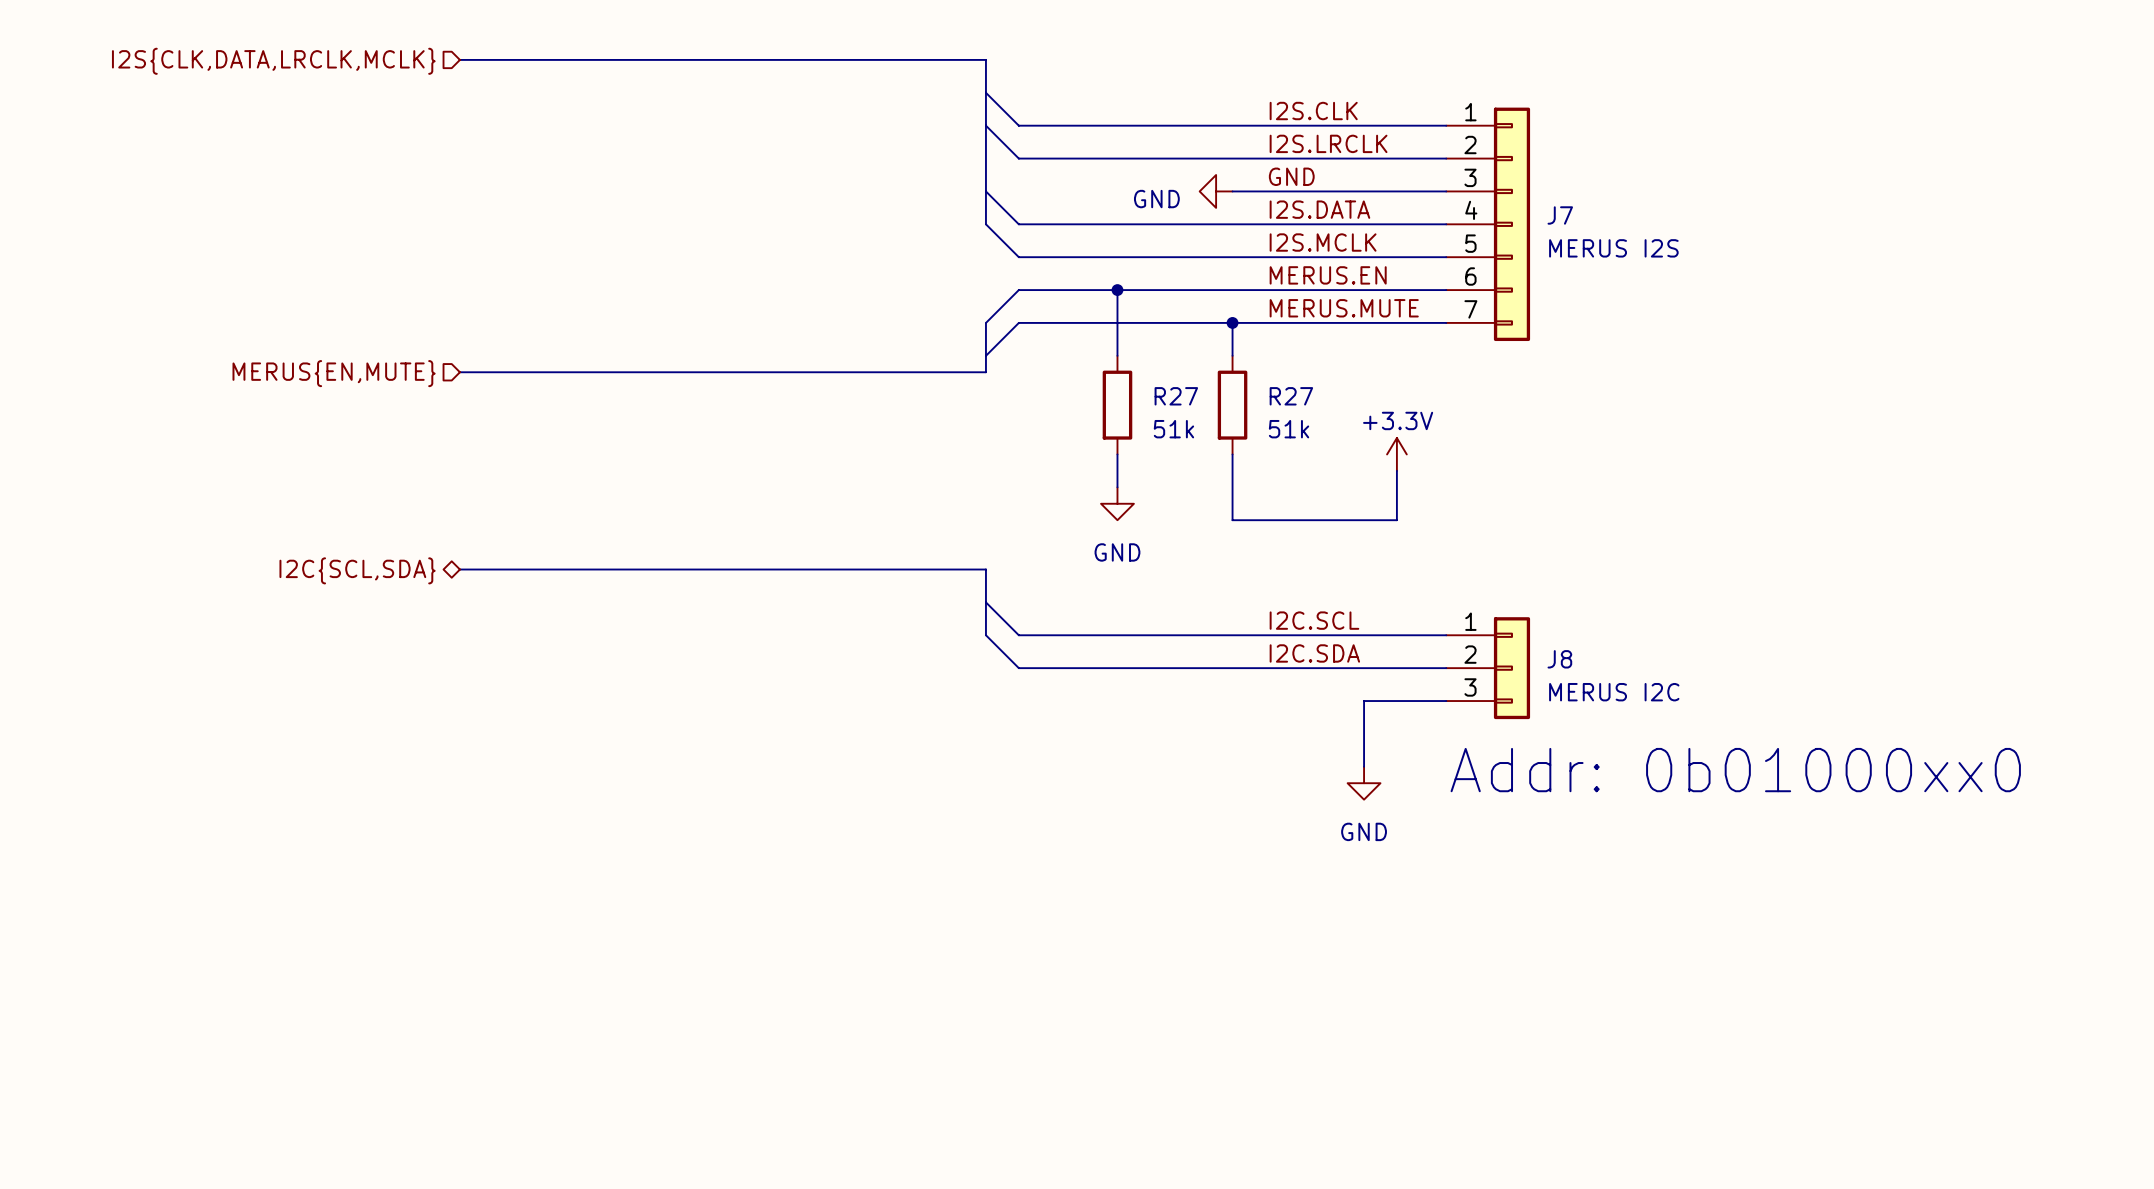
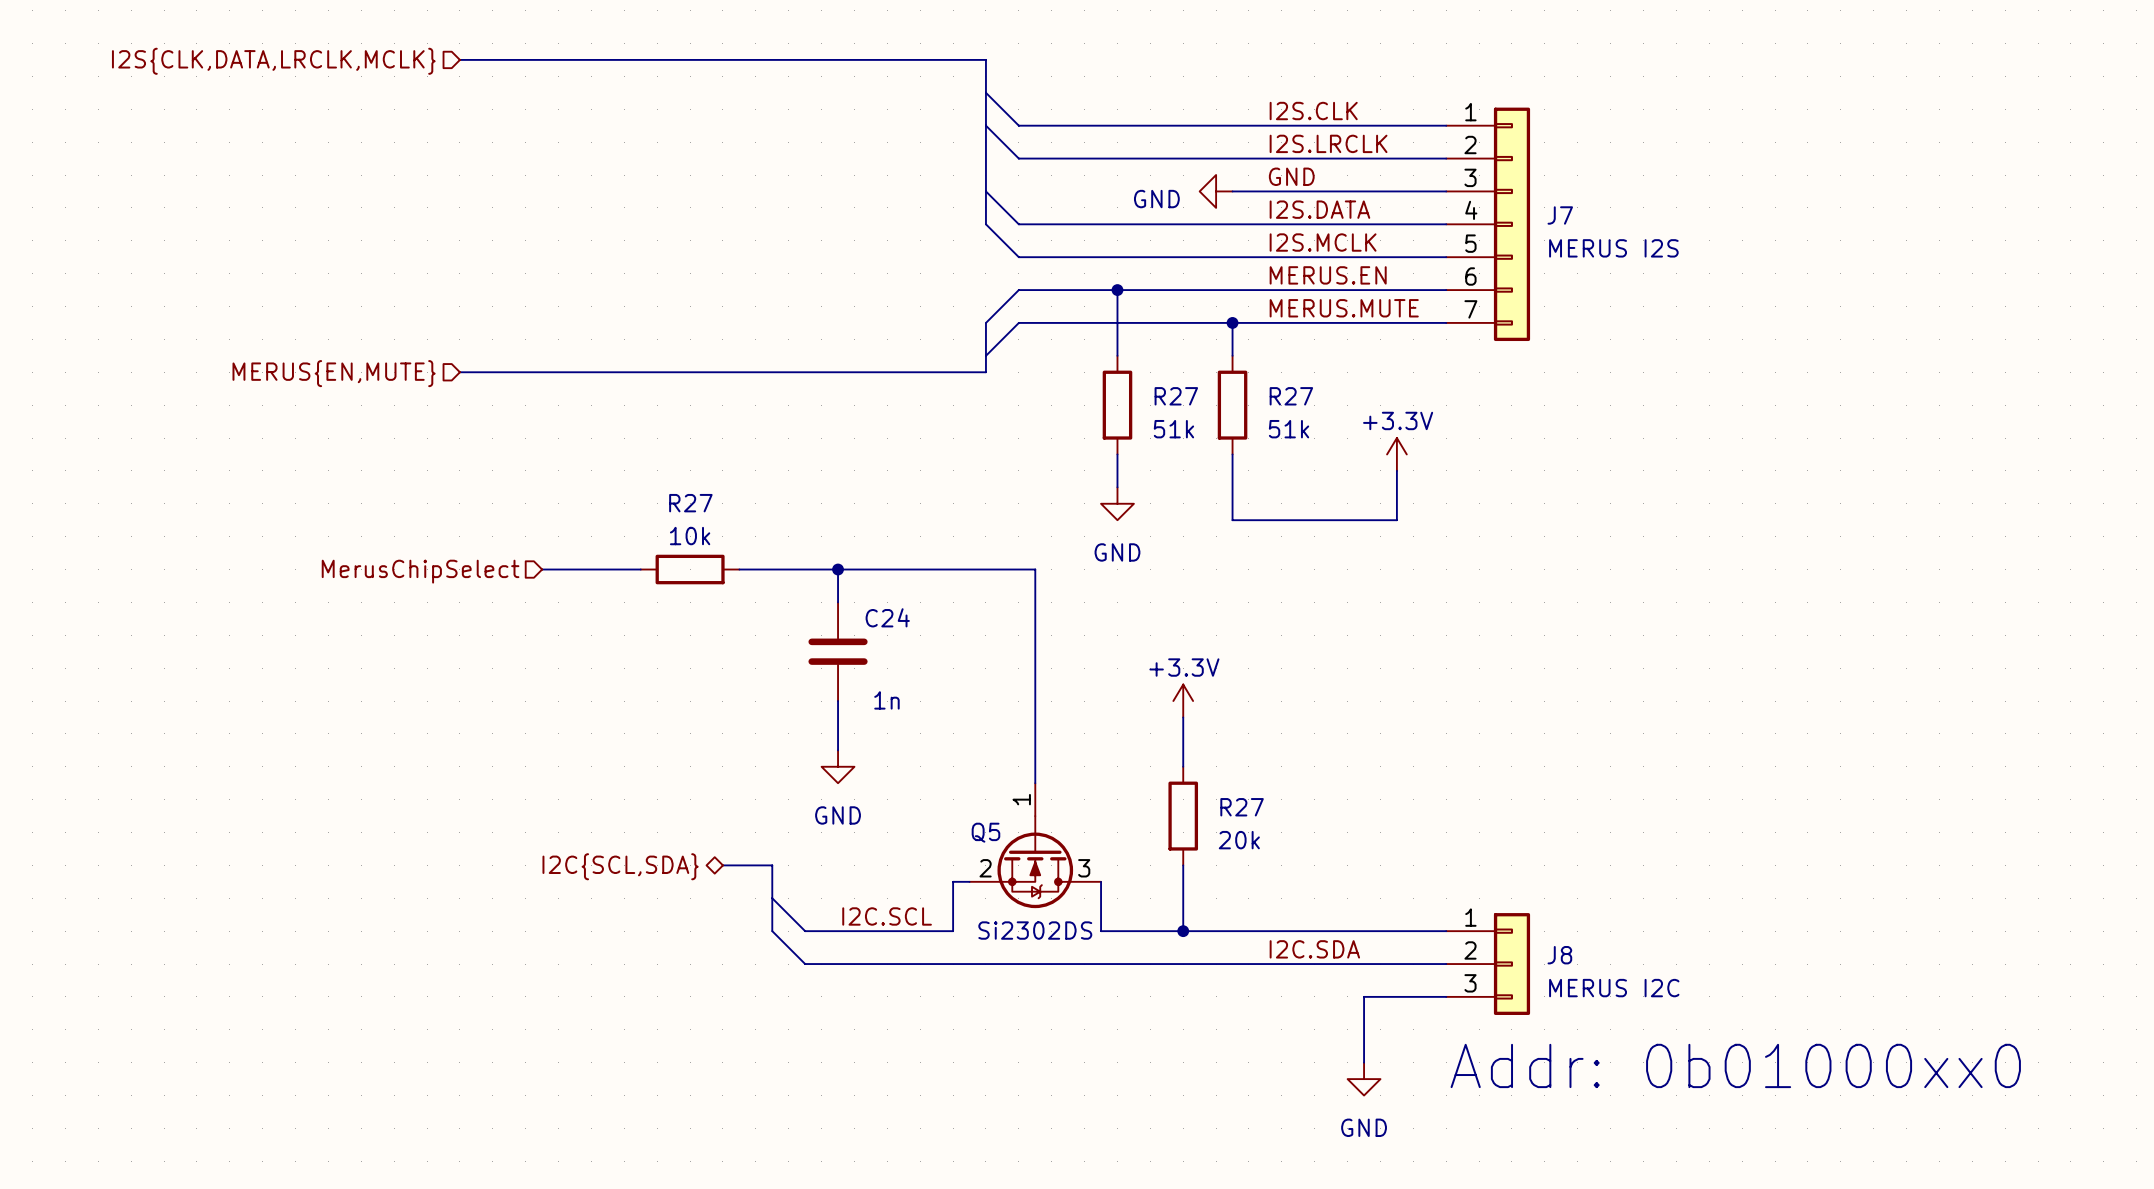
bus: (459, 569) (985, 569) (985, 635) -> none
R27: none -> 10k (690, 569)
wire: none -> (739, 569) (1035, 569) (1035, 783)
wire: none -> (838, 569) (838, 602)
junction: none -> (838, 569)
hierarchical label: I2C{SCL,SDA} (357, 570) -> none
hierarchical label: none -> MerusChipSelect (420, 571)
wire: (985, 602) (1018, 635) (1446, 635) -> none
label: I2C.SCL (1314, 620) -> none
wire: (985, 635) (1018, 668) (1446, 668) -> none
C24: none -> 1n (838, 651)
label position: I2C.SDA (1314, 653) -> I2C.SDA (1314, 949)
J8 position: (1488, 668) -> (1488, 964)
wire: none -> (838, 701) (838, 750)
power symbol: none -> +3.3V (1183, 701)
wire: (1446, 701) (1364, 701) (1364, 766) -> (1446, 996) (1364, 996) (1364, 1062)
wire: none -> (1183, 717) (1183, 766)
power symbol: none -> GND (838, 766)
text position: Addr: 0b01000xx0 (1735, 770) -> Addr: 0b01000xx0 (1735, 1065)
power symbol: GND (1364, 783) -> none
R27: none -> 20k (1183, 816)
Q5: none -> Si2302DS (1035, 845)
bus: none -> (722, 865) (772, 865) (772, 931)
wire: none -> (1183, 865) (1183, 931)
hierarchical label: none -> I2C{SCL,SDA} (620, 866)
wire: none -> (969, 881) (953, 881) (953, 931) (805, 931) (772, 898)
wire: none -> (1101, 881) (1101, 931) (1446, 931)
label: none -> I2C.SCL (887, 916)
wire: none -> (772, 931) (805, 964) (1446, 964)
junction: none -> (1183, 931)
power symbol: none -> GND (1364, 1079)

